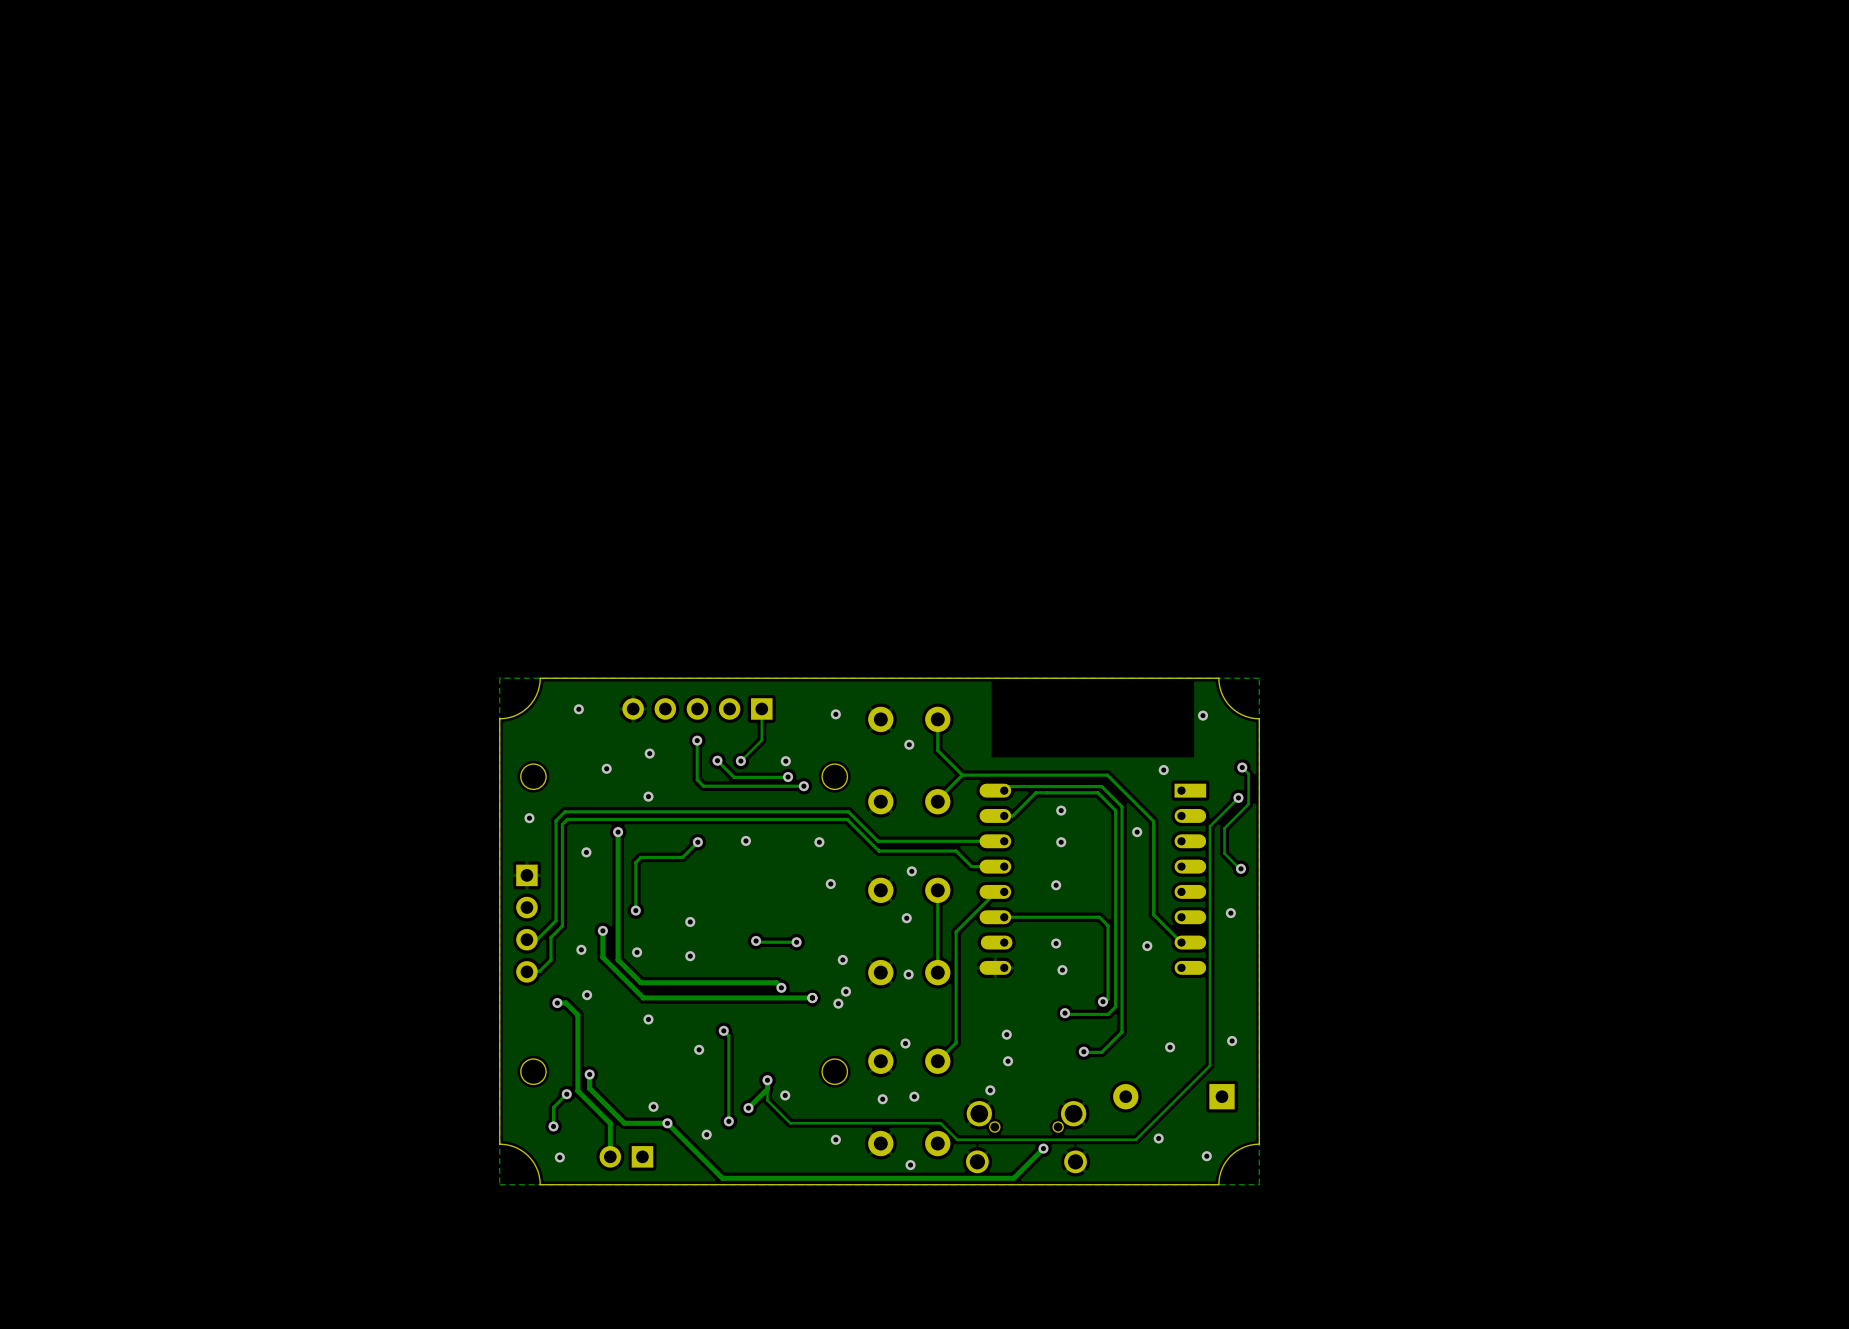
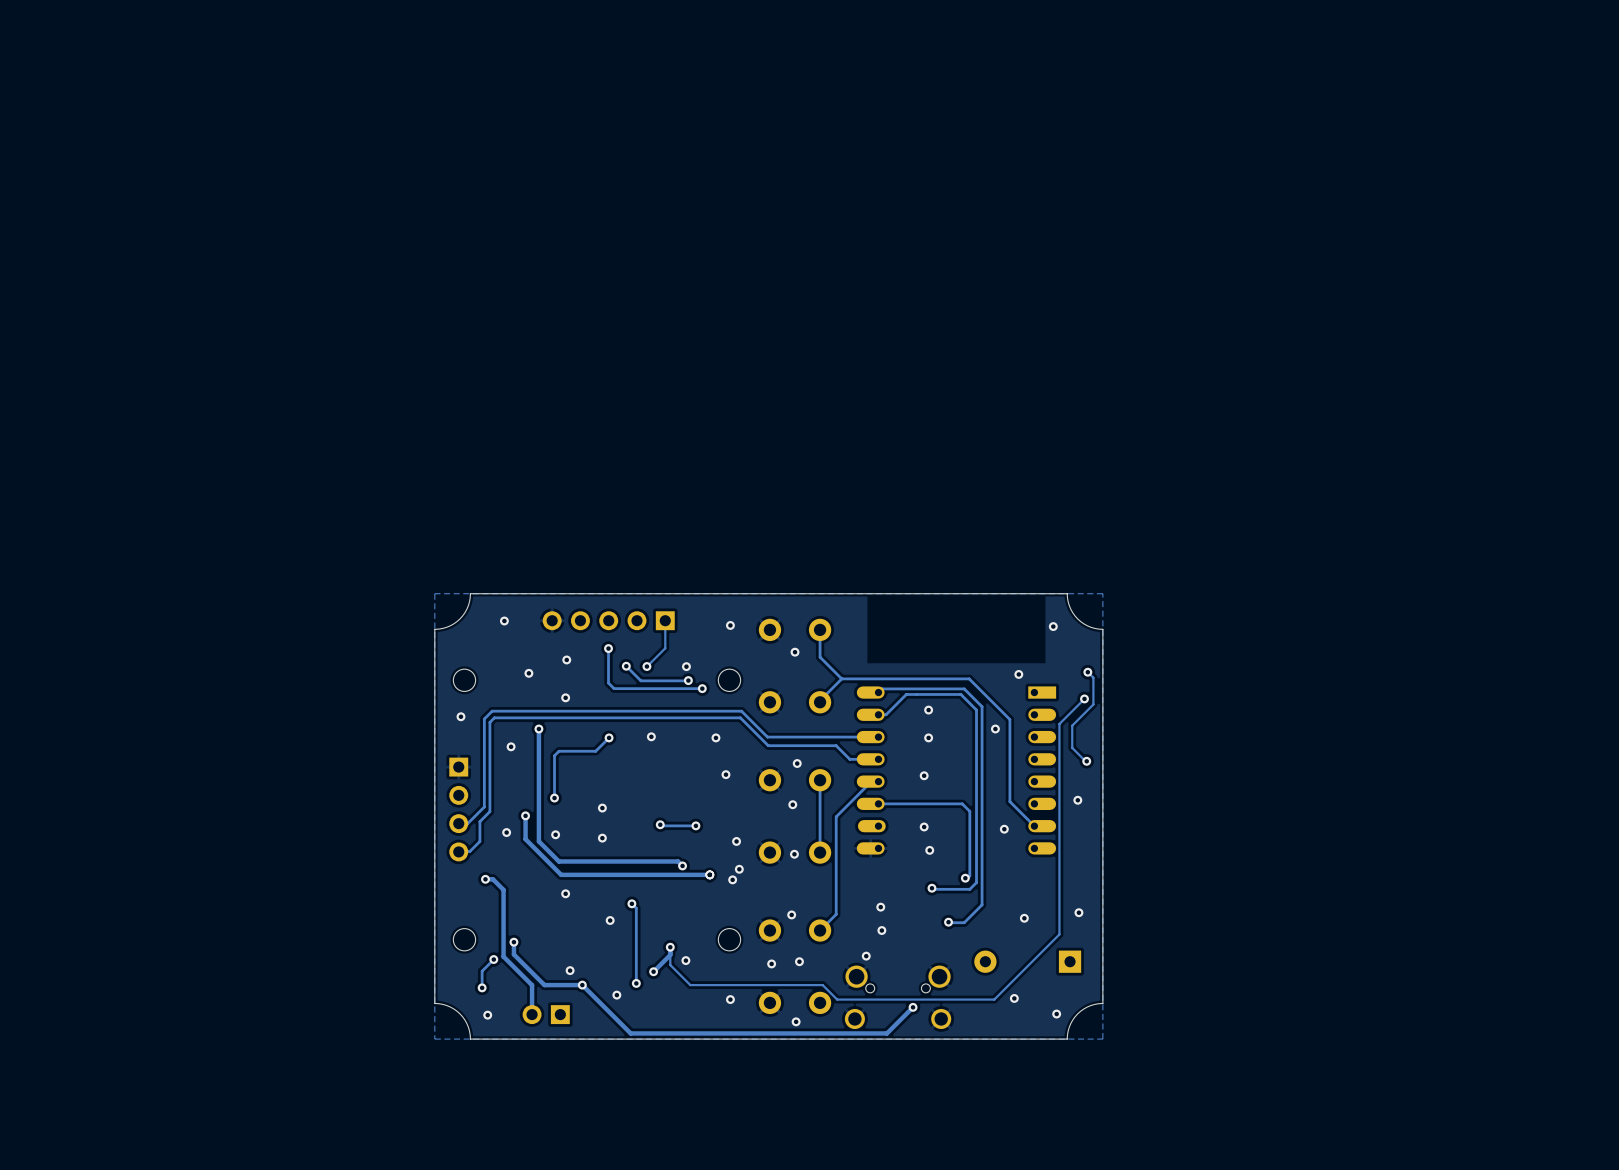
via: (587, 995) -> none

